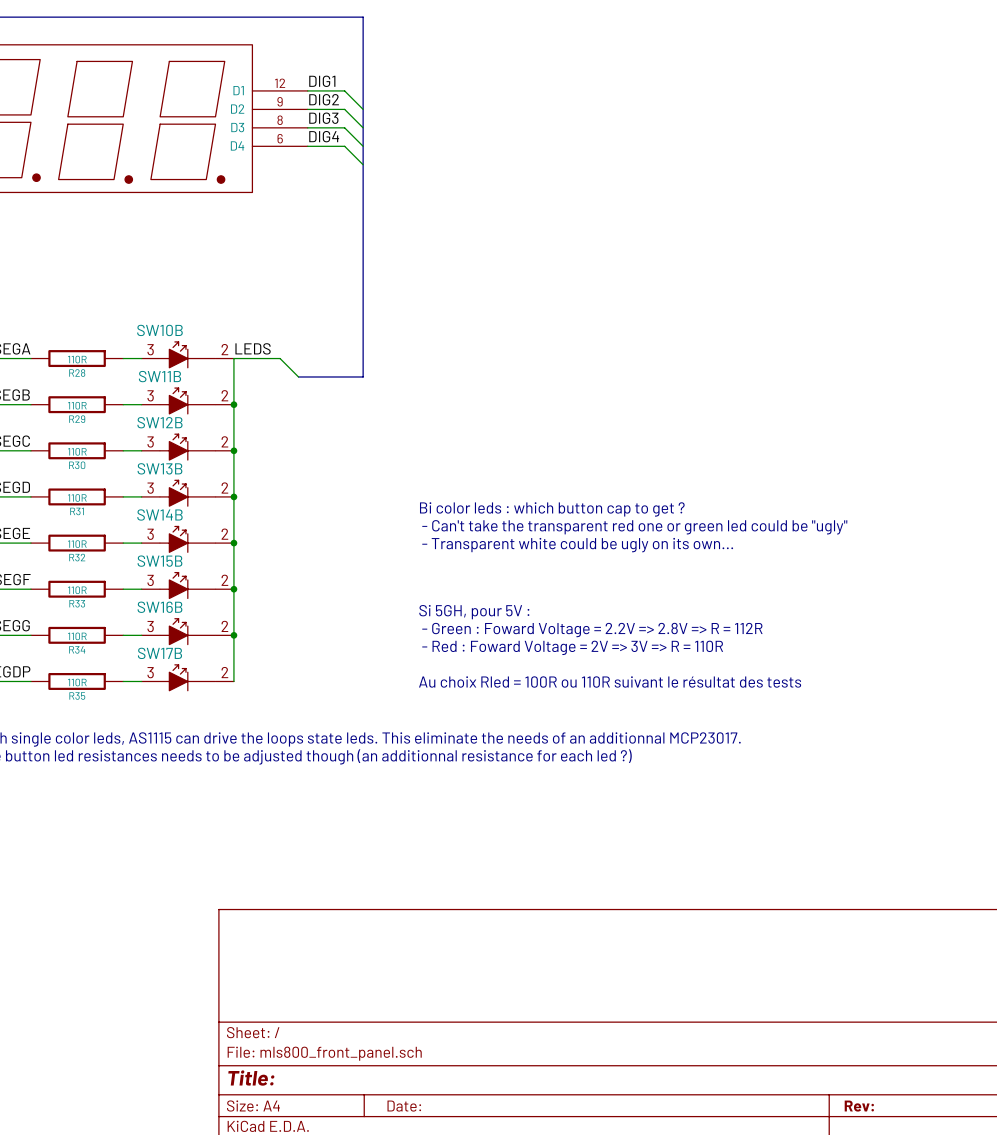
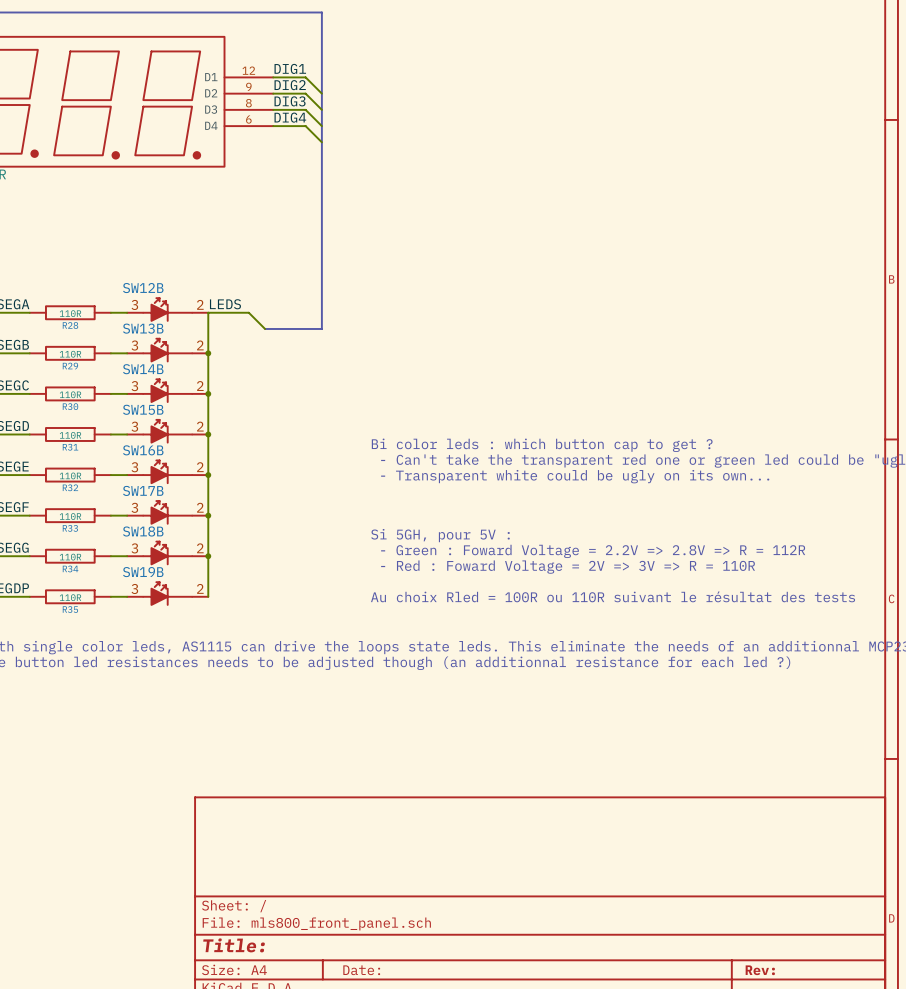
SW10B name: SW10B (159, 330) -> SW12B (143, 288)
SW11B name: SW11B (159, 376) -> SW13B (143, 328)
SW12B name: SW12B (159, 422) -> SW14B (143, 369)
SW13B name: SW13B (159, 468) -> SW15B (143, 409)
SW14B name: SW14B (159, 514) -> SW16B (143, 450)
SW15B name: SW15B (159, 561) -> SW17B (143, 490)
SW16B name: SW16B (159, 607) -> SW18B (143, 531)
SW17B name: SW17B (159, 653) -> SW19B (143, 572)

